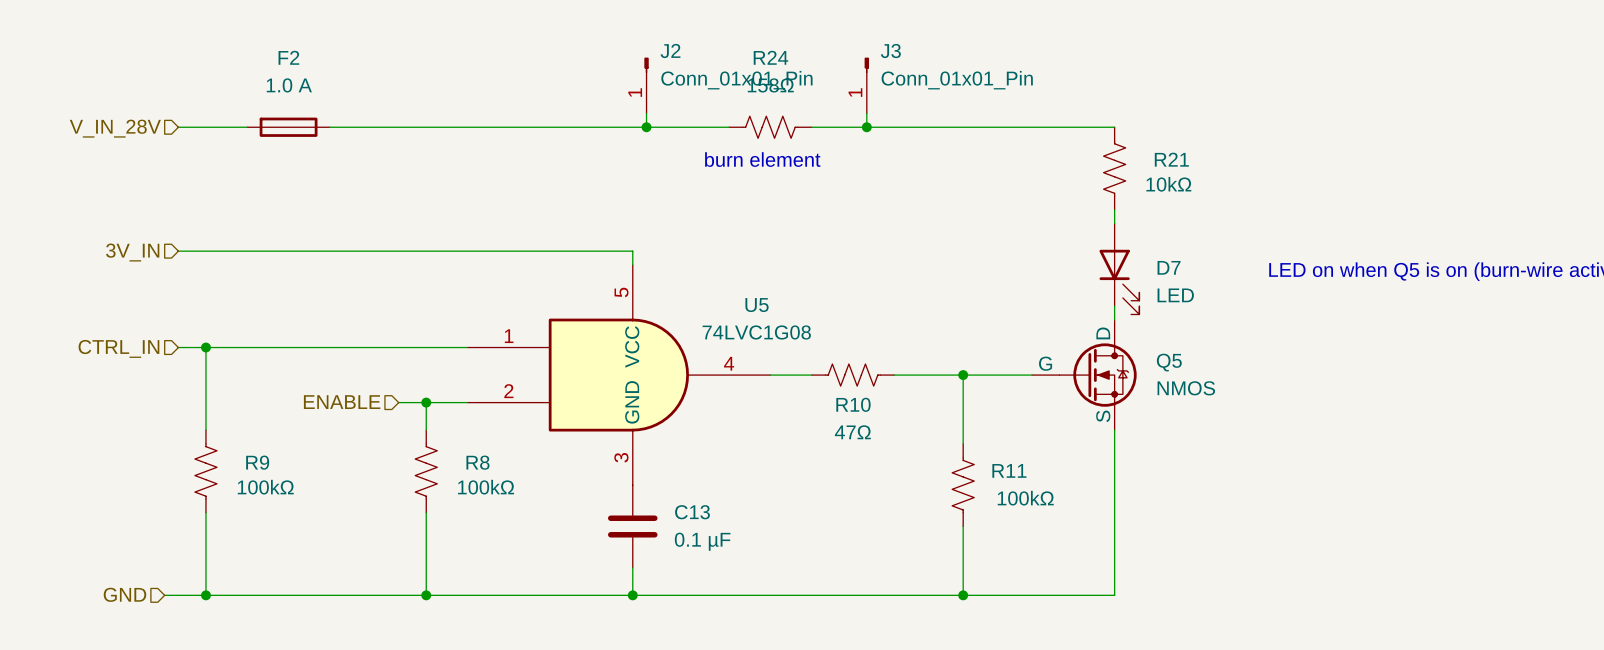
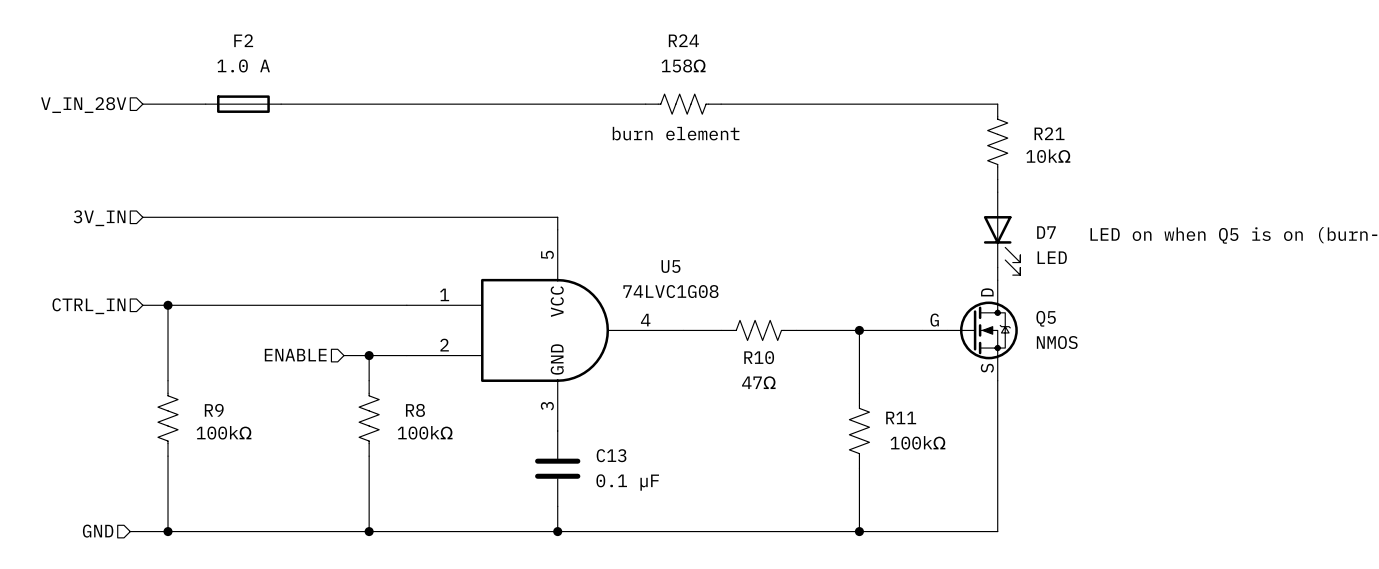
J2: Conn_01x01_Pin (646, 85) -> none
J3: Conn_01x01_Pin (866, 85) -> none
wire: (646, 113) (646, 127) -> none
wire: (866, 113) (866, 127) -> none
junction: (646, 127) -> none
junction: (866, 127) -> none

